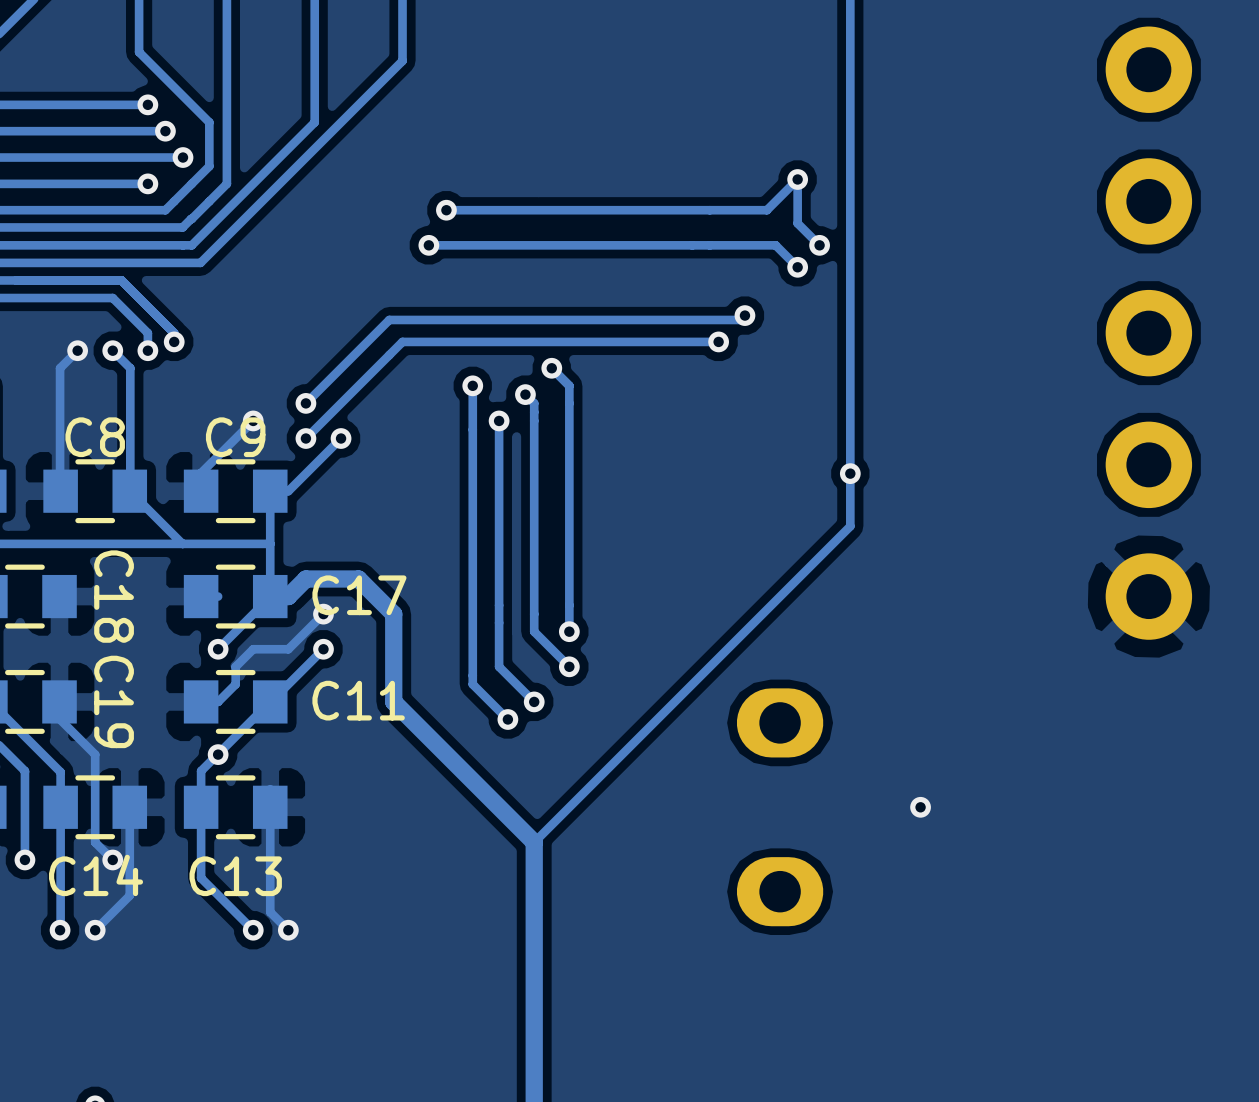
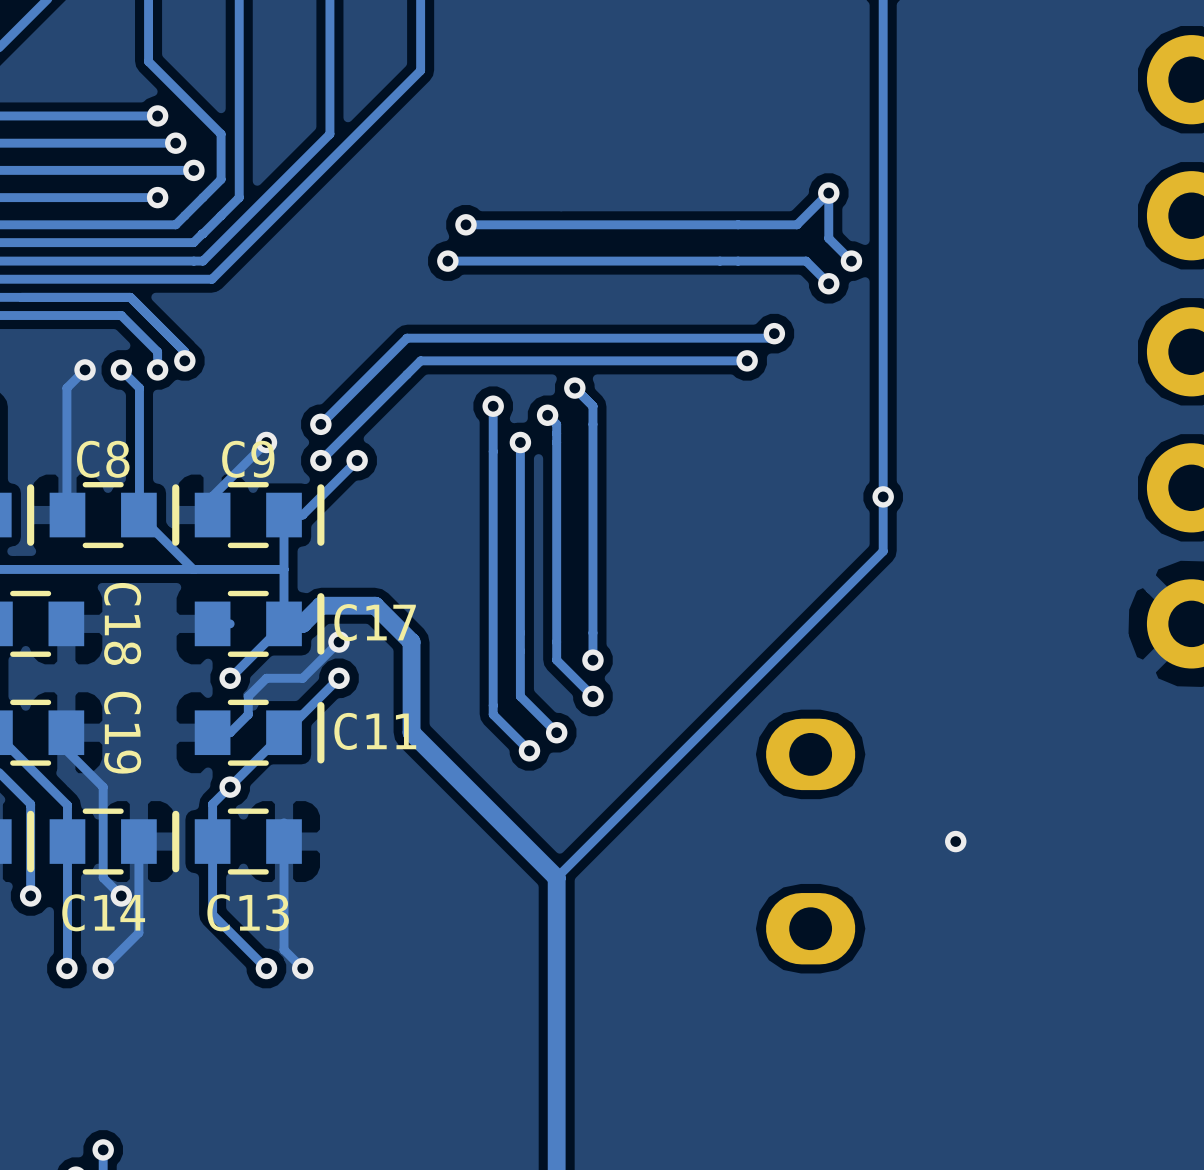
line: none -> (30, 487) (30, 542)
line: none -> (175, 487) (175, 542)
line: none -> (320, 487) (320, 542)
line: none -> (320, 596) (320, 651)
line: none -> (320, 705) (320, 759)
line: none -> (30, 814) (30, 868)
line: none -> (175, 814) (175, 868)

